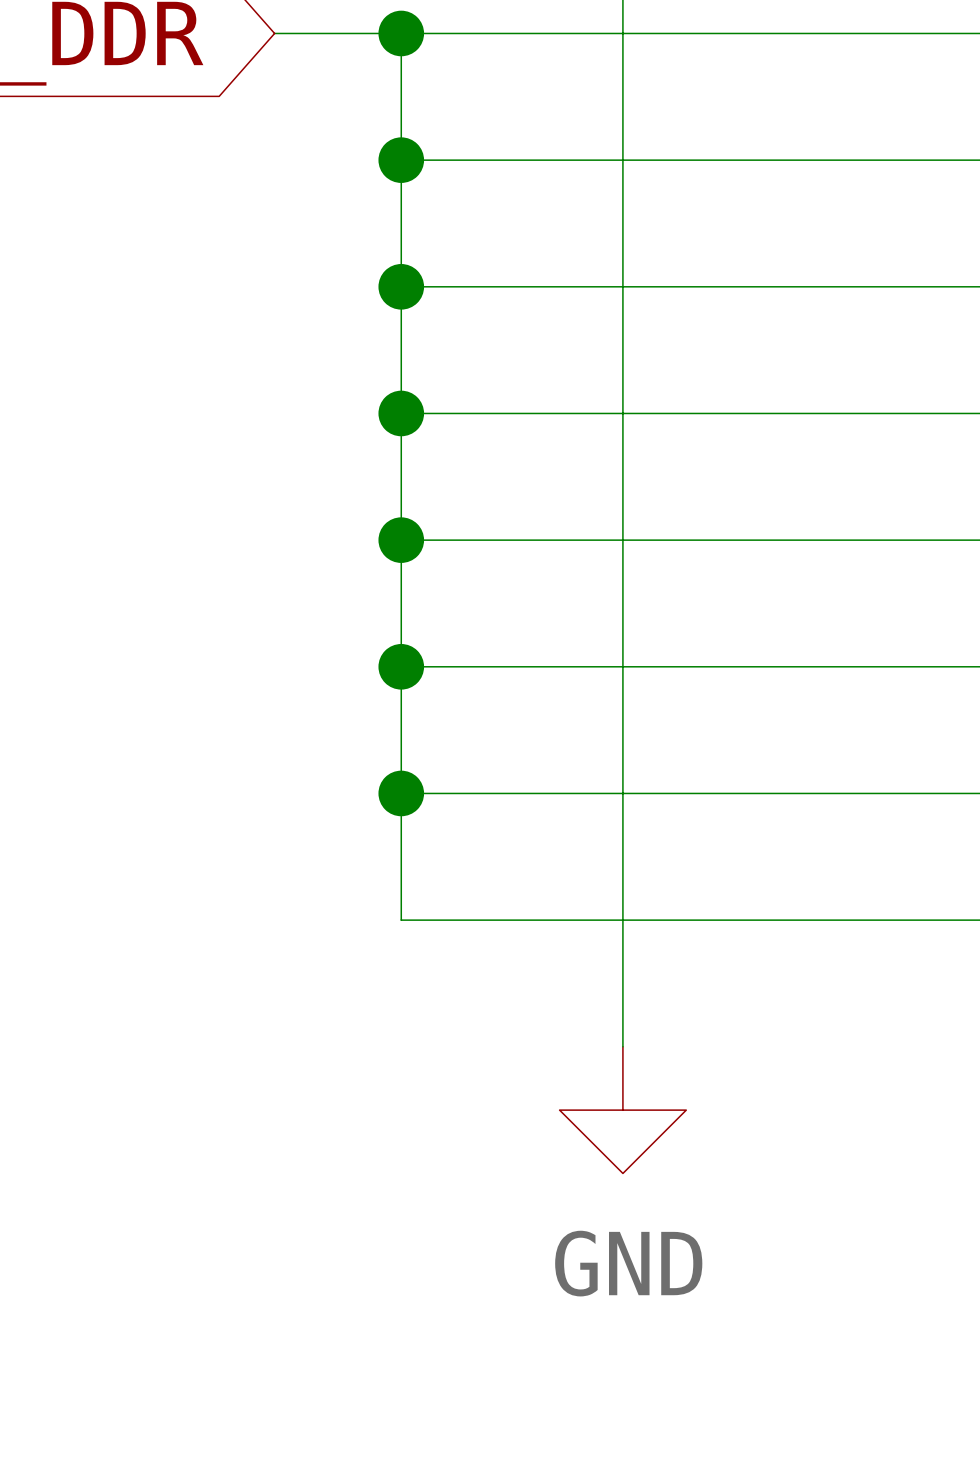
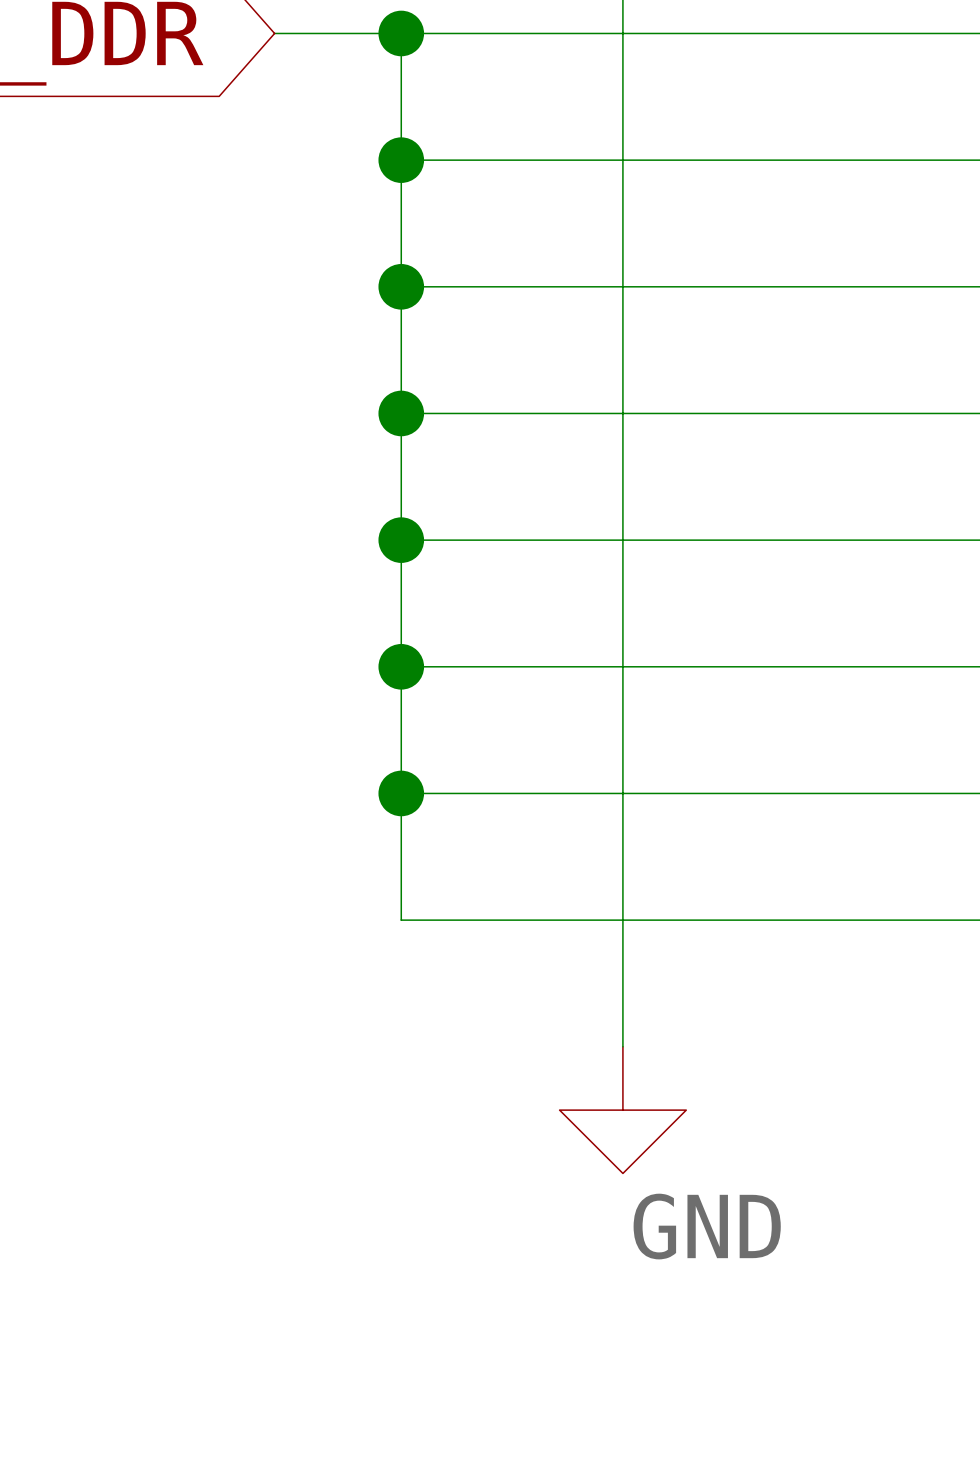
power symbol text position: GND (628, 1263) -> GND (707, 1226)

